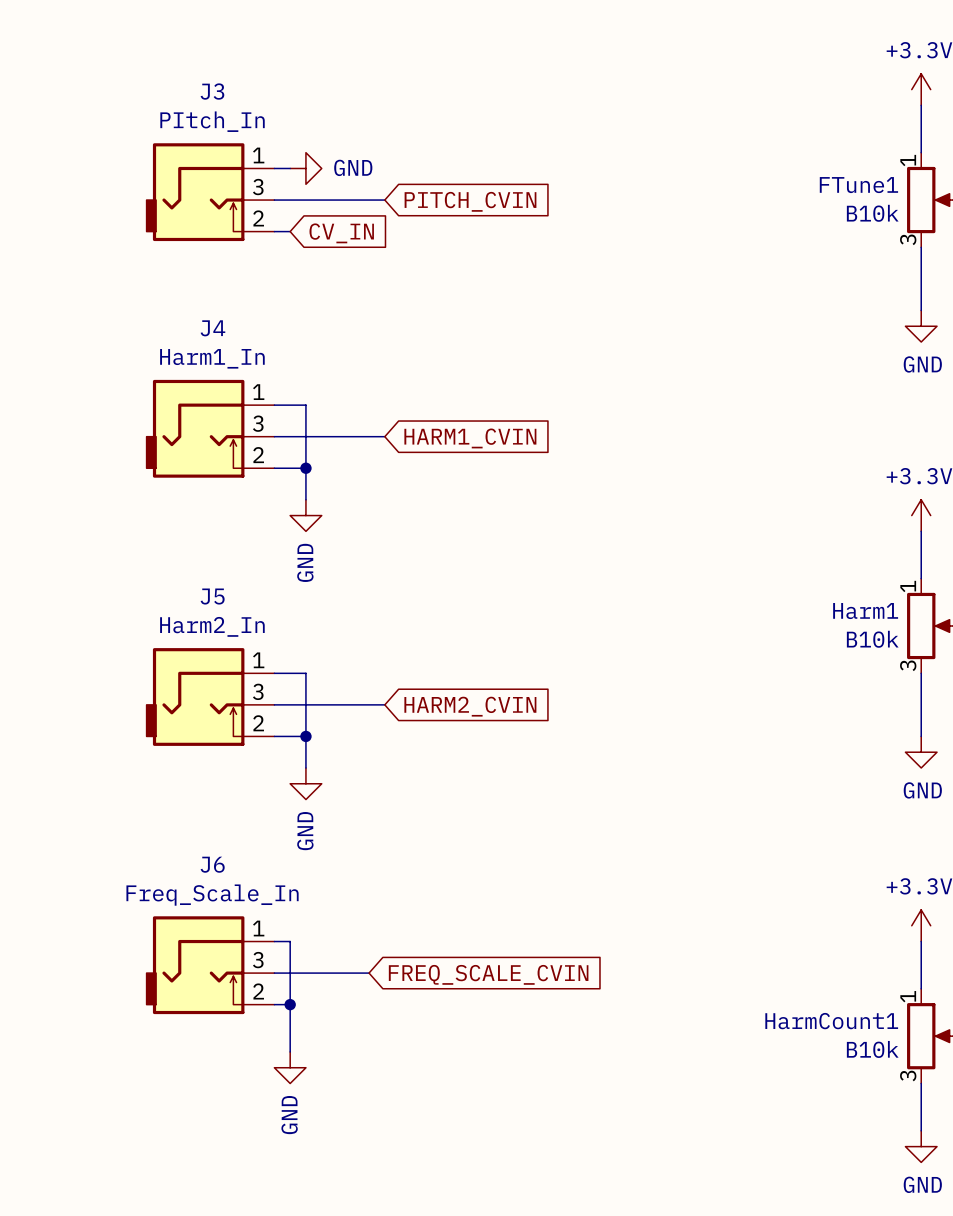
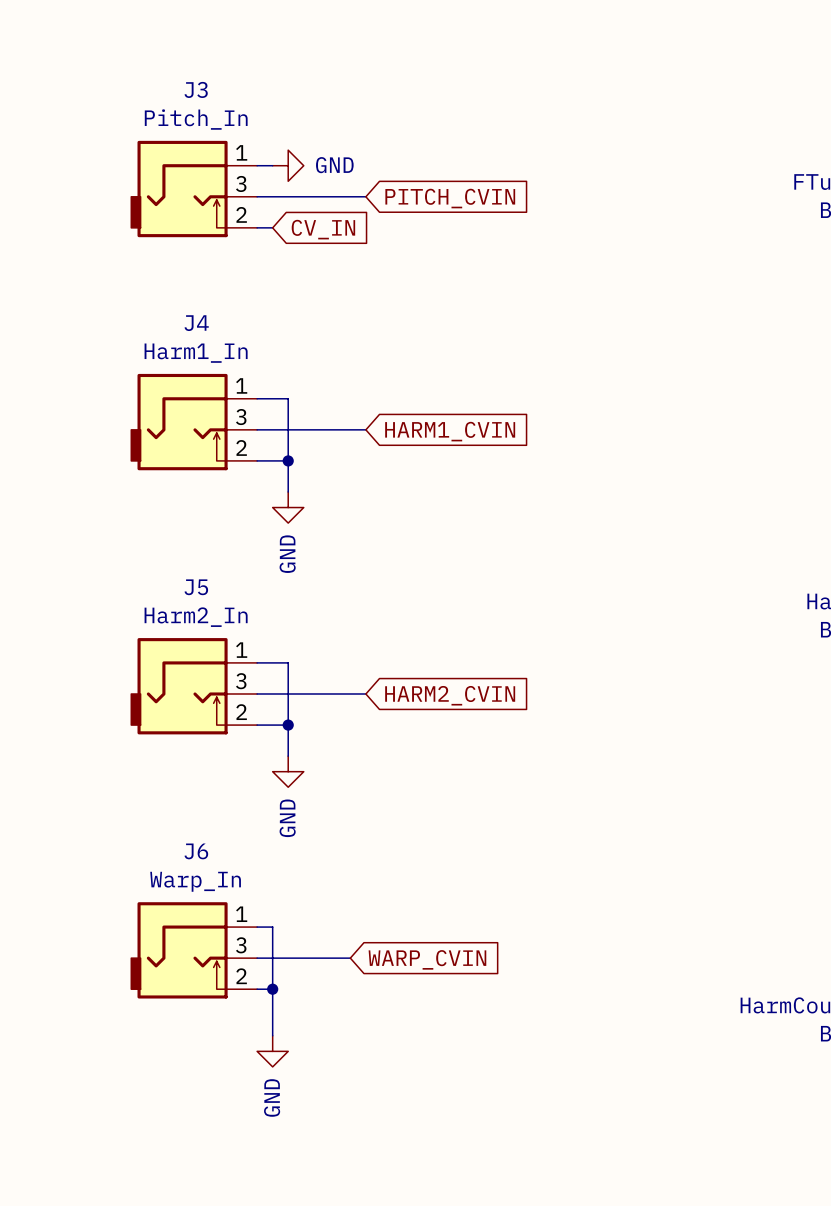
J3 value: PItch_In (212, 121) -> Pitch_In (196, 119)
J6 value: Freq_Scale_In (212, 895) -> Warp_In (195, 881)
global label: FREQ_SCALE_CVIN (488, 974) -> WARP_CVIN (427, 959)

